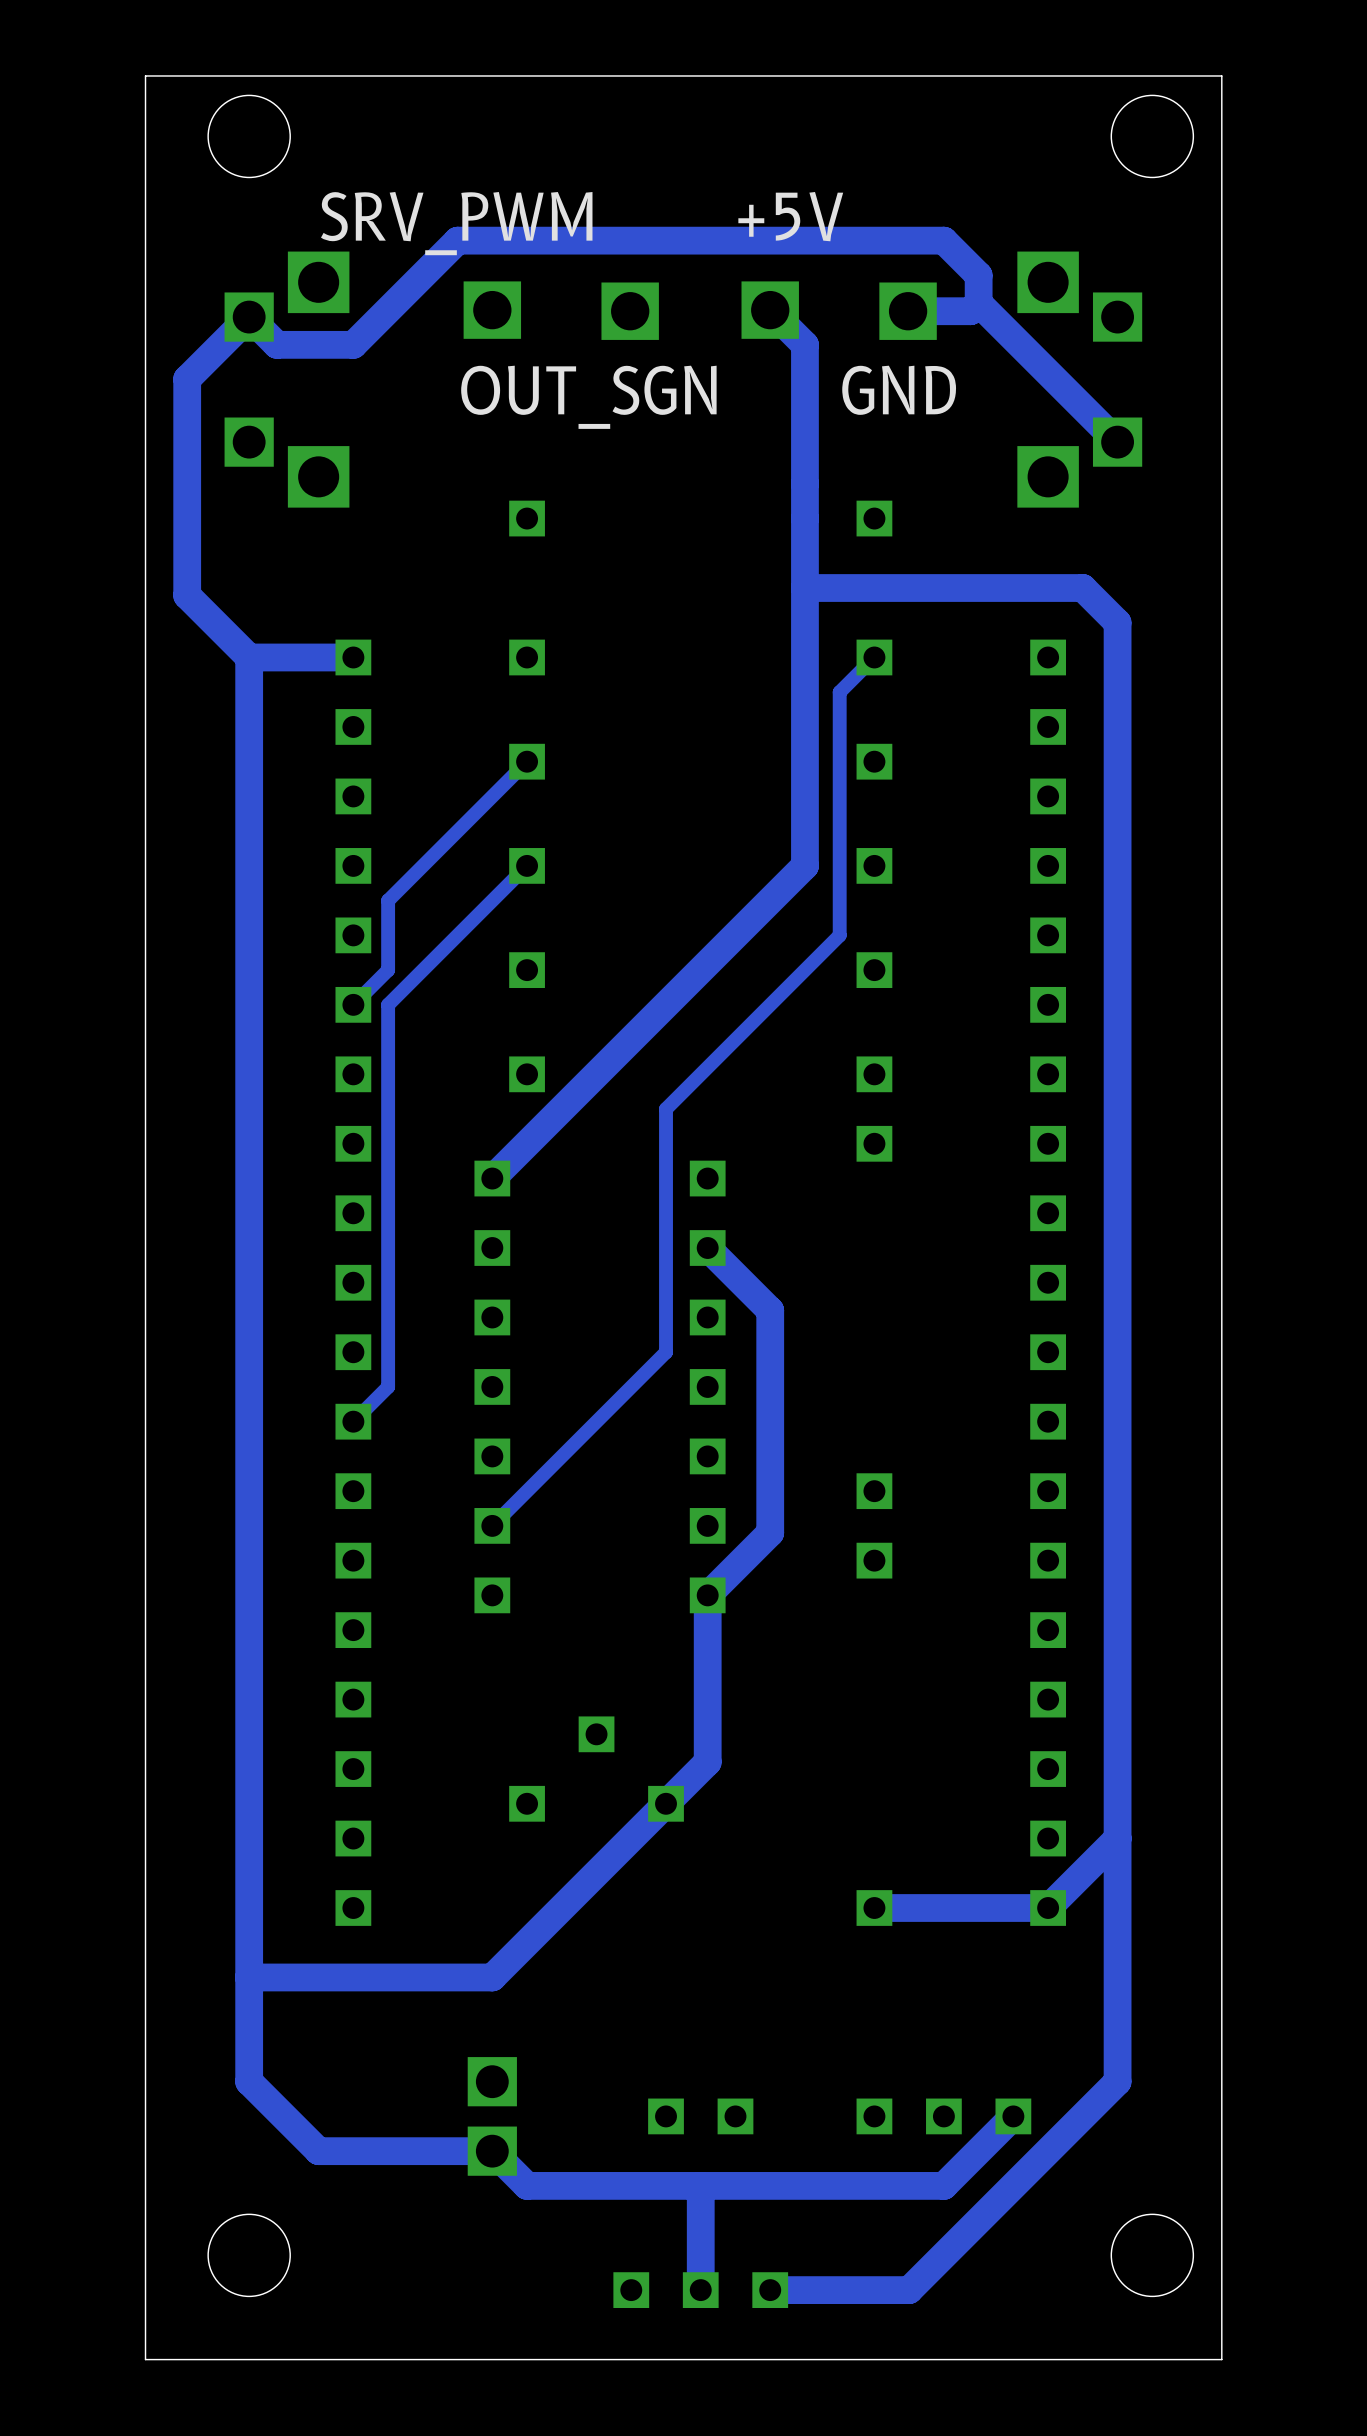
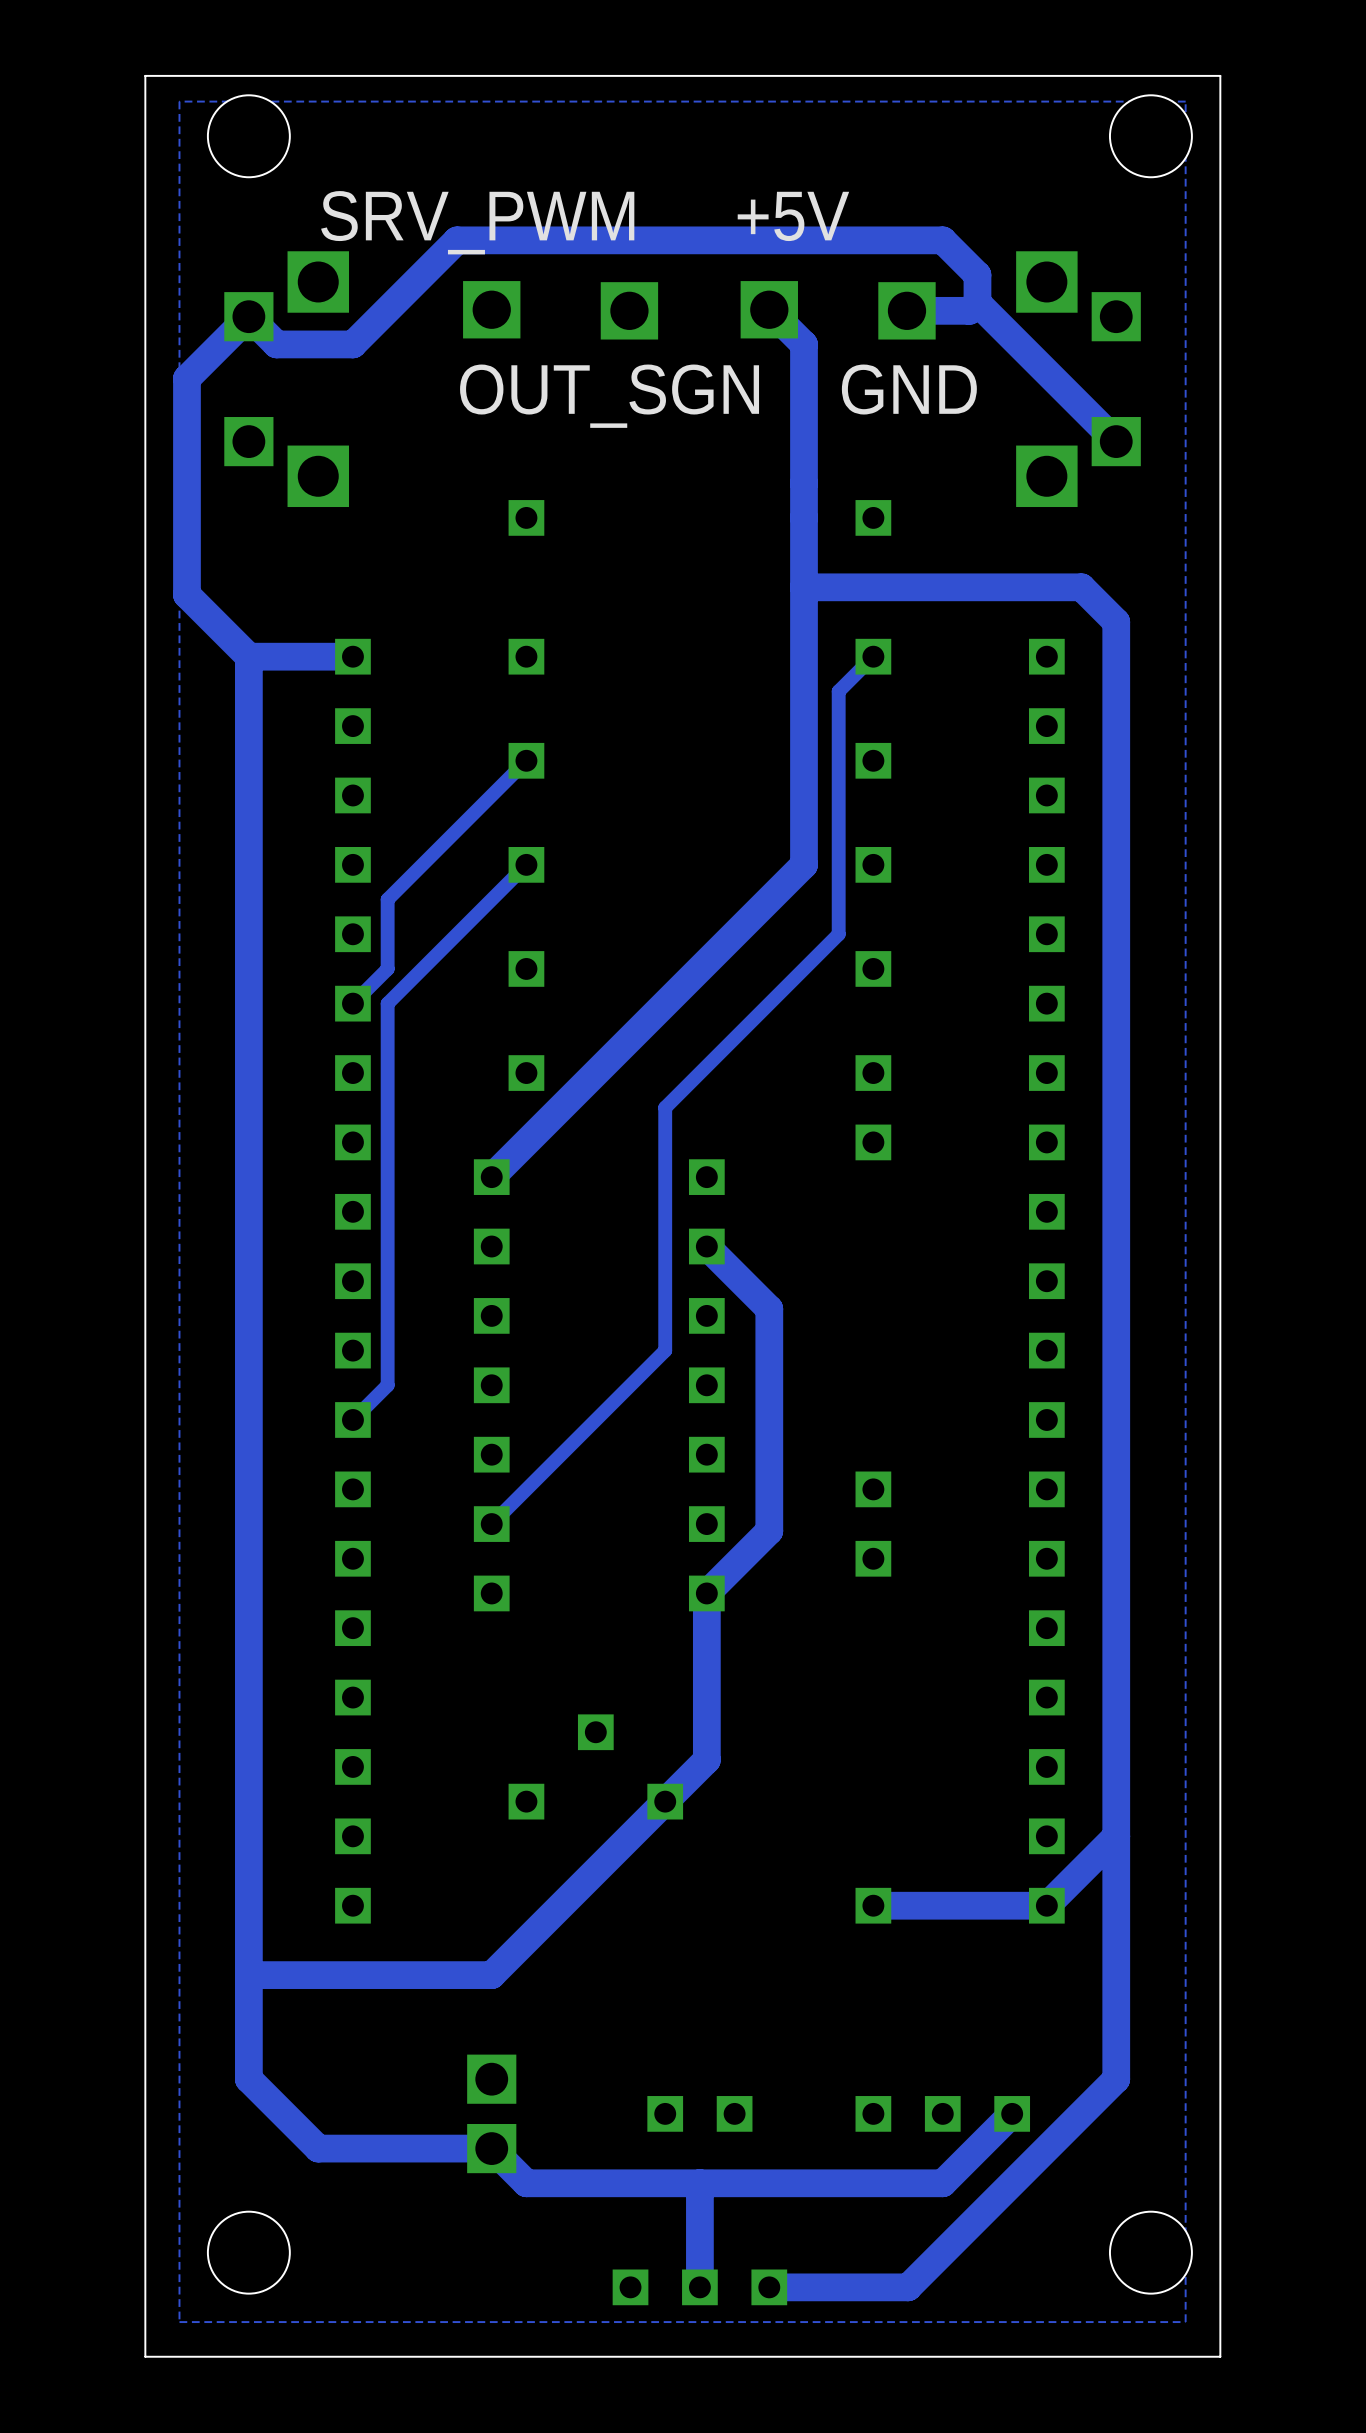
zone outline: none -> (1185, 101) (179, 101) (179, 2322) (1185, 2322) (1185, 101)

